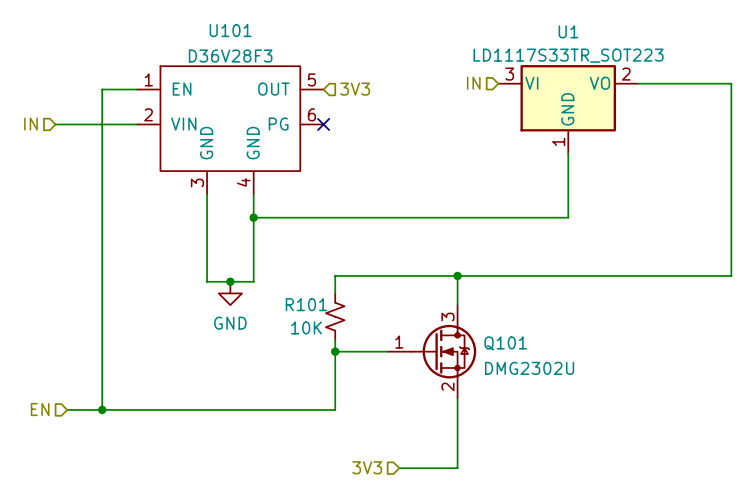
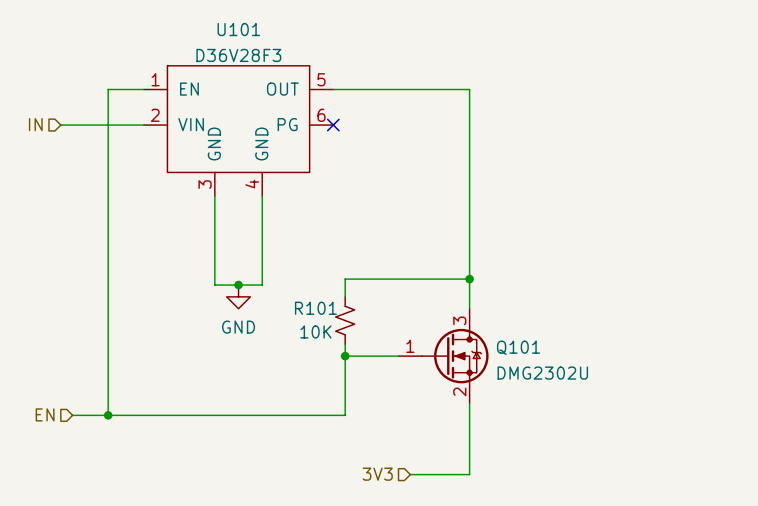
hierarchical label: IN (473, 83) -> none
wire: (638, 83) (731, 83) (731, 275) (457, 275) -> (333, 89) (469, 89) (469, 279)
hierarchical label: 3V3 (355, 89) -> none
U1: LD1117S33TR_SOT223 (568, 109) -> none
wire: (568, 153) (568, 217) (253, 217) -> none
junction: (253, 217) -> none

